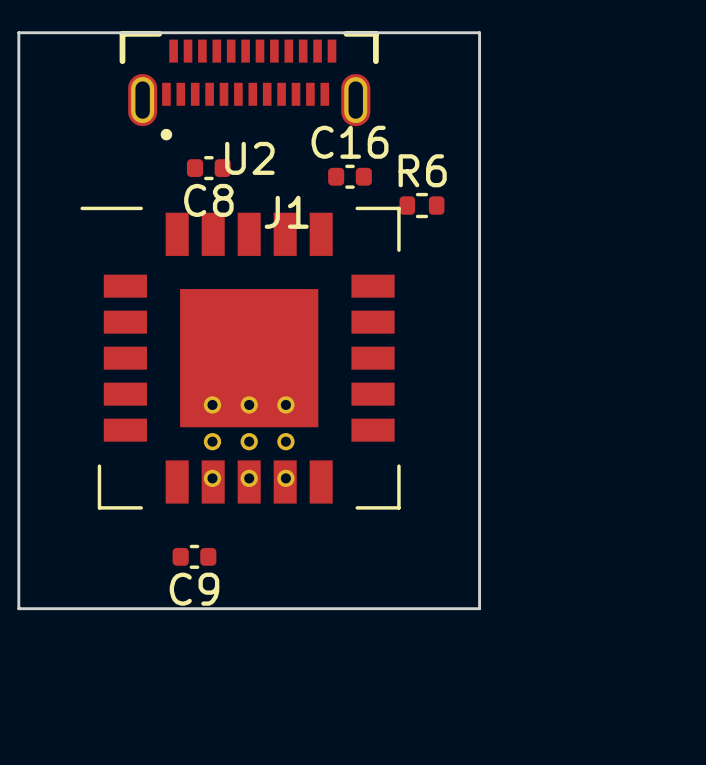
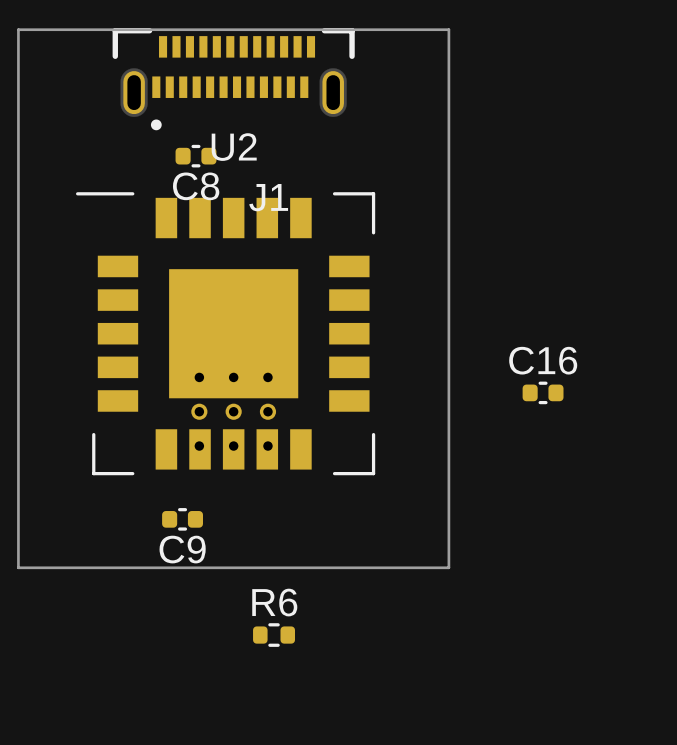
C16 position: (349, 176) -> (543, 392)
R6 position: (421, 205) -> (274, 635)

